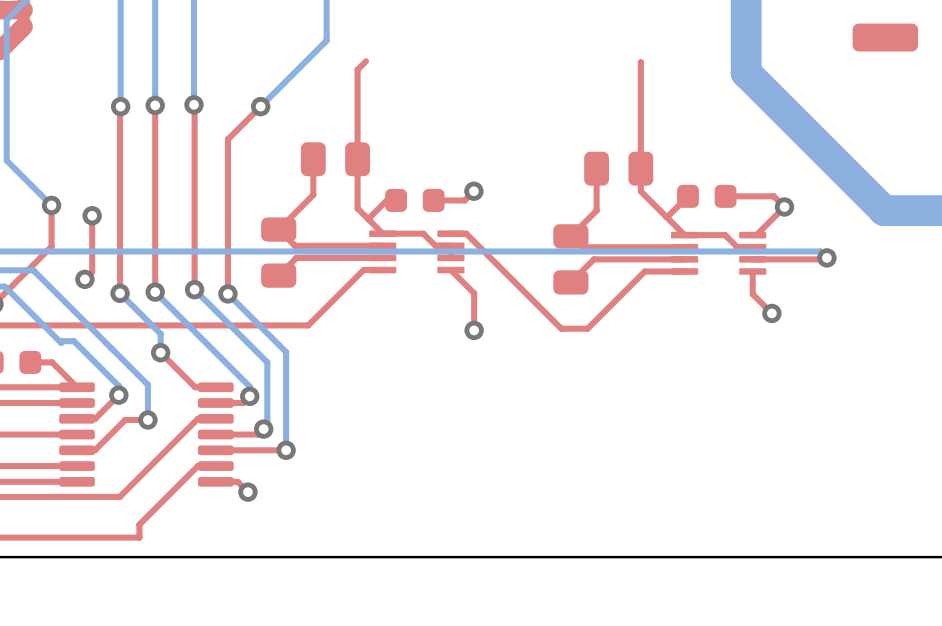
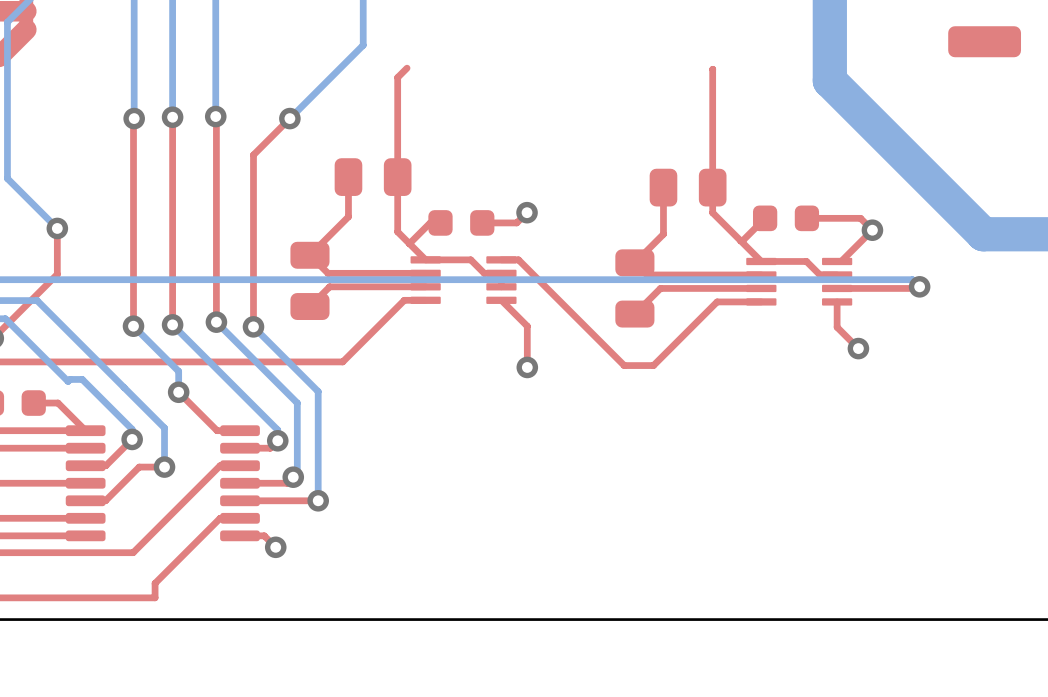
top track: (92, 215) (92, 272) (84, 279) -> none
via: (92, 215) -> none
via: (84, 279) -> none

